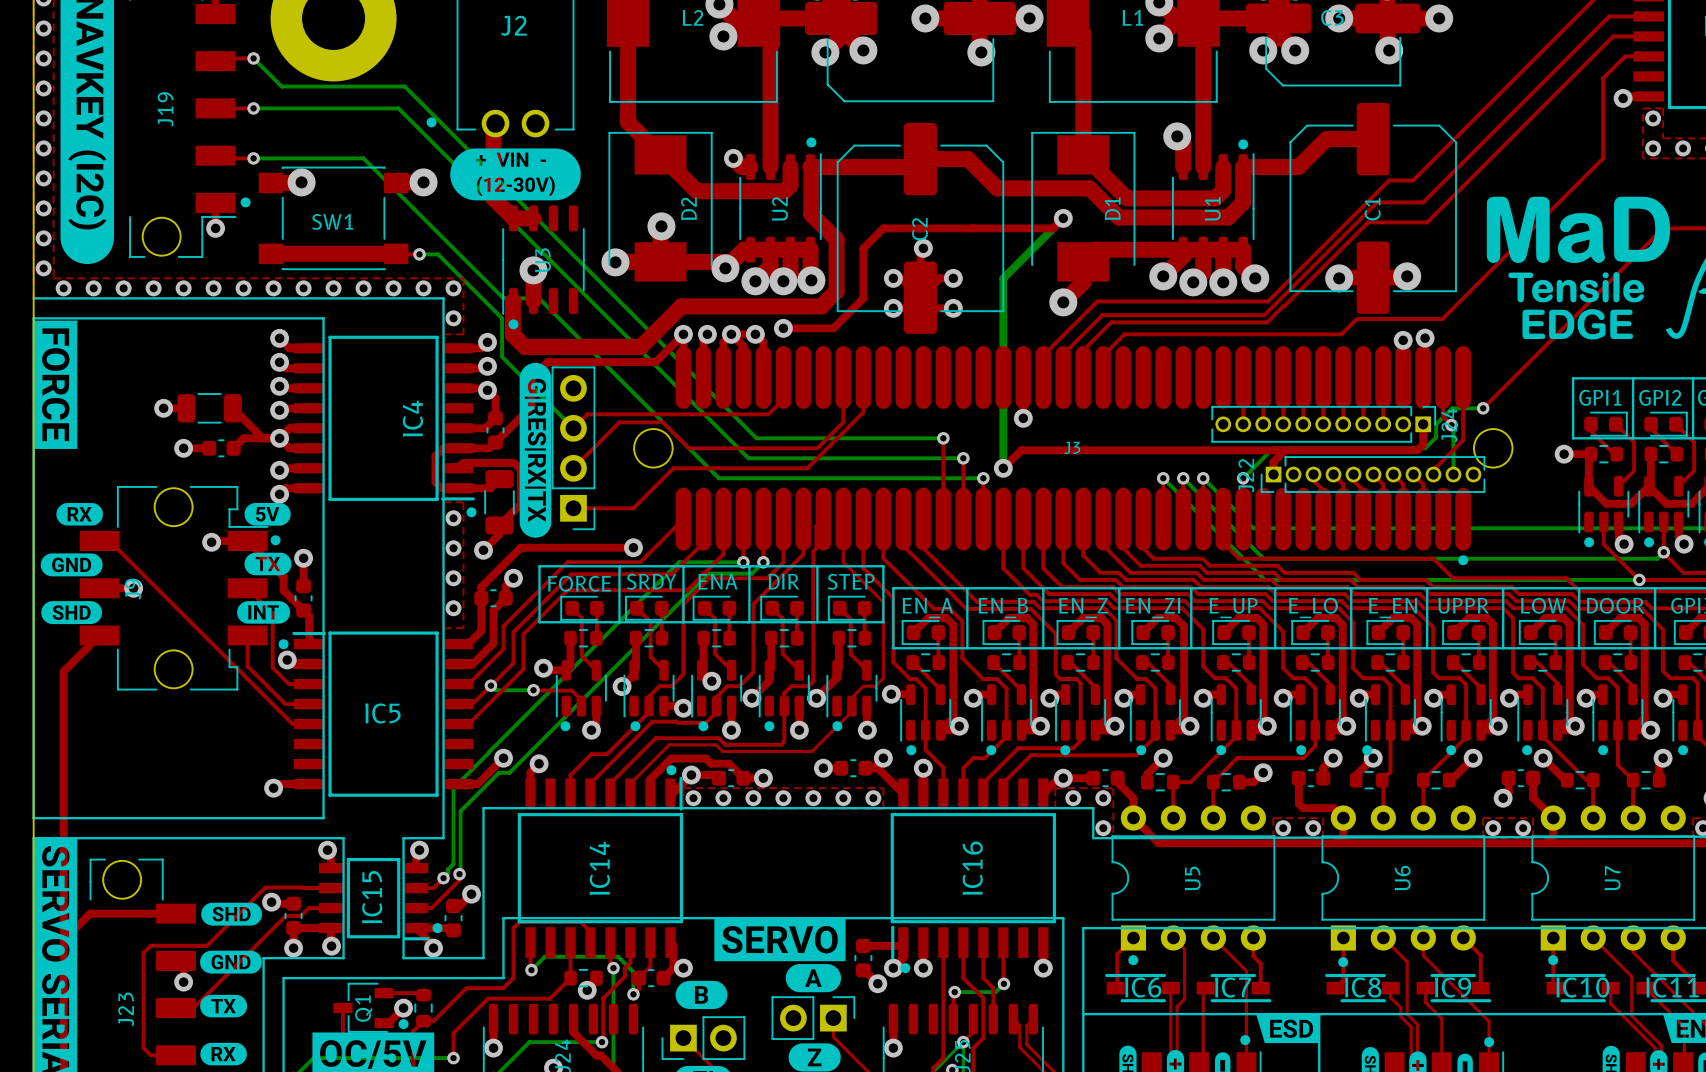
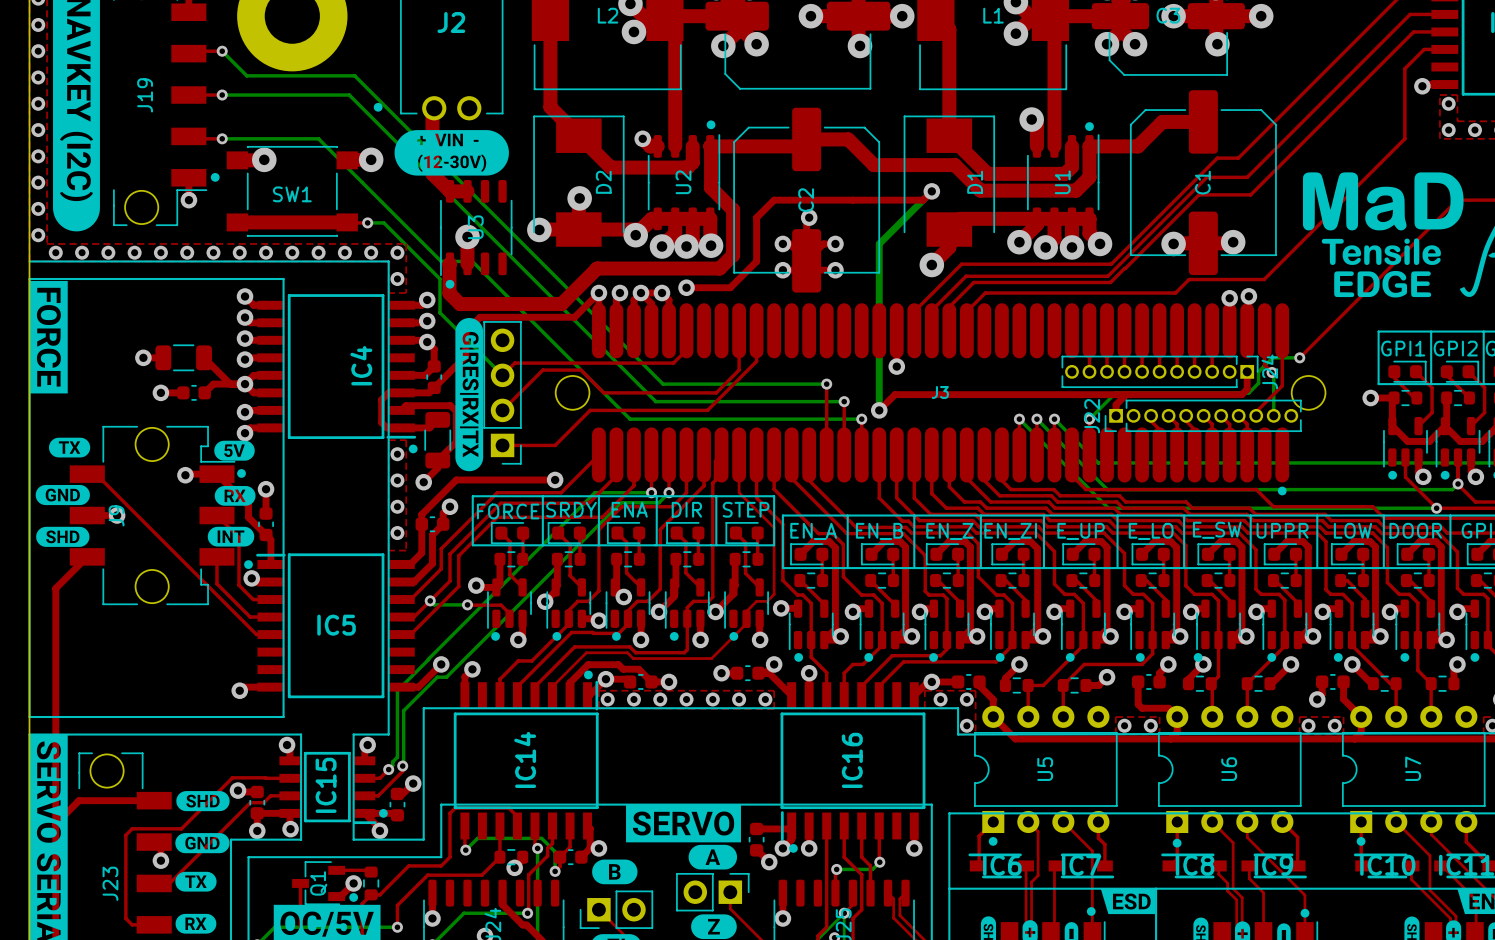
drawing position: (79, 514) -> (235, 495)
drawing position: (267, 564) -> (69, 447)
text: E_EN (1392, 608) -> E_SW (1217, 530)

